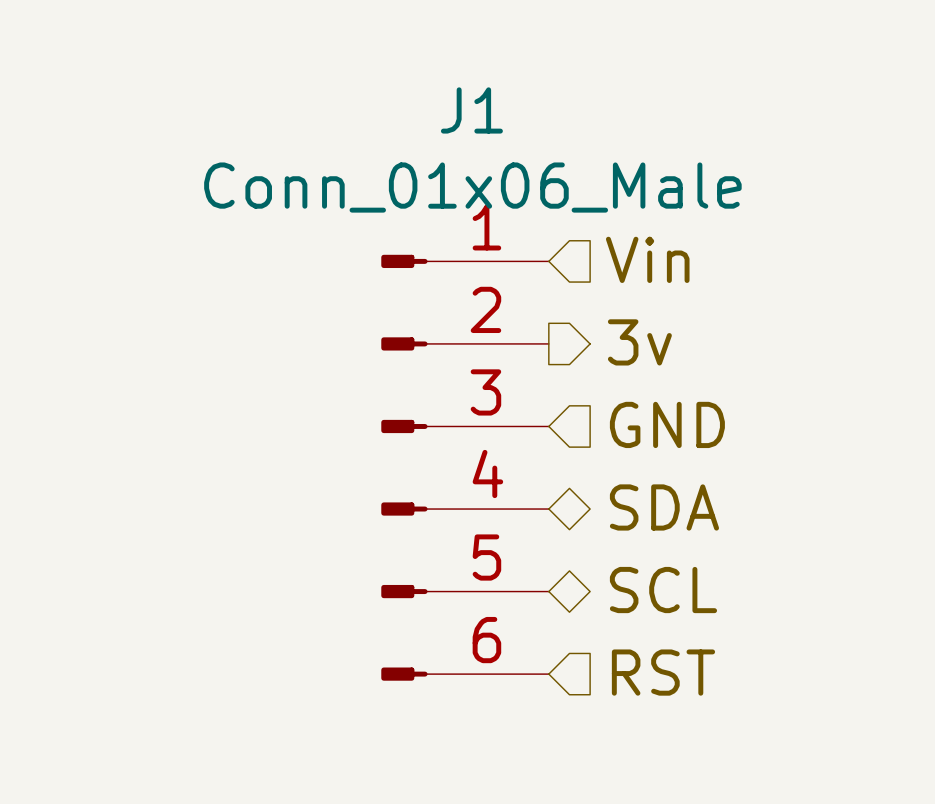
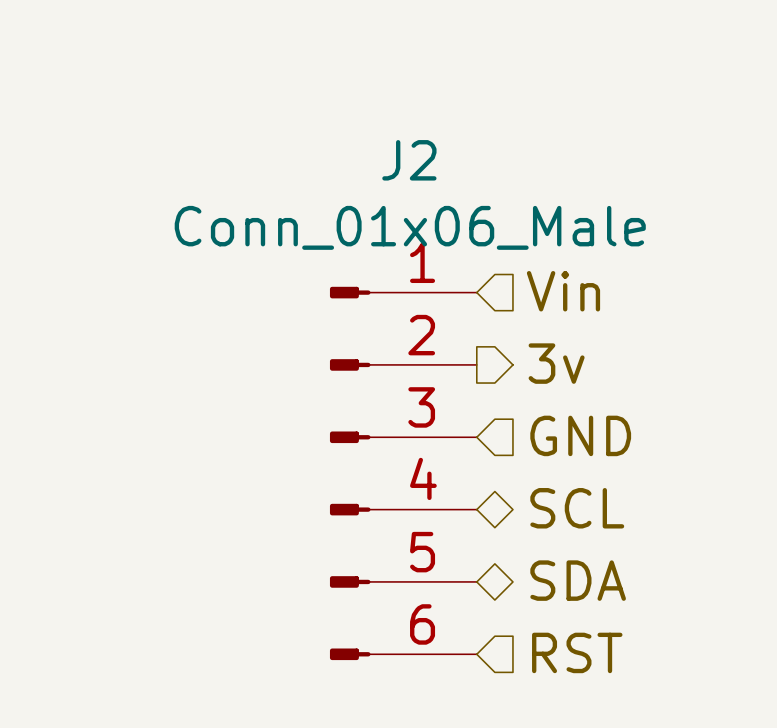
J1 name: J1 (471, 110) -> J2 (409, 160)
hierarchical label: SDA (664, 507) -> SCL (577, 508)
hierarchical label: SCL (663, 590) -> SDA (578, 580)

